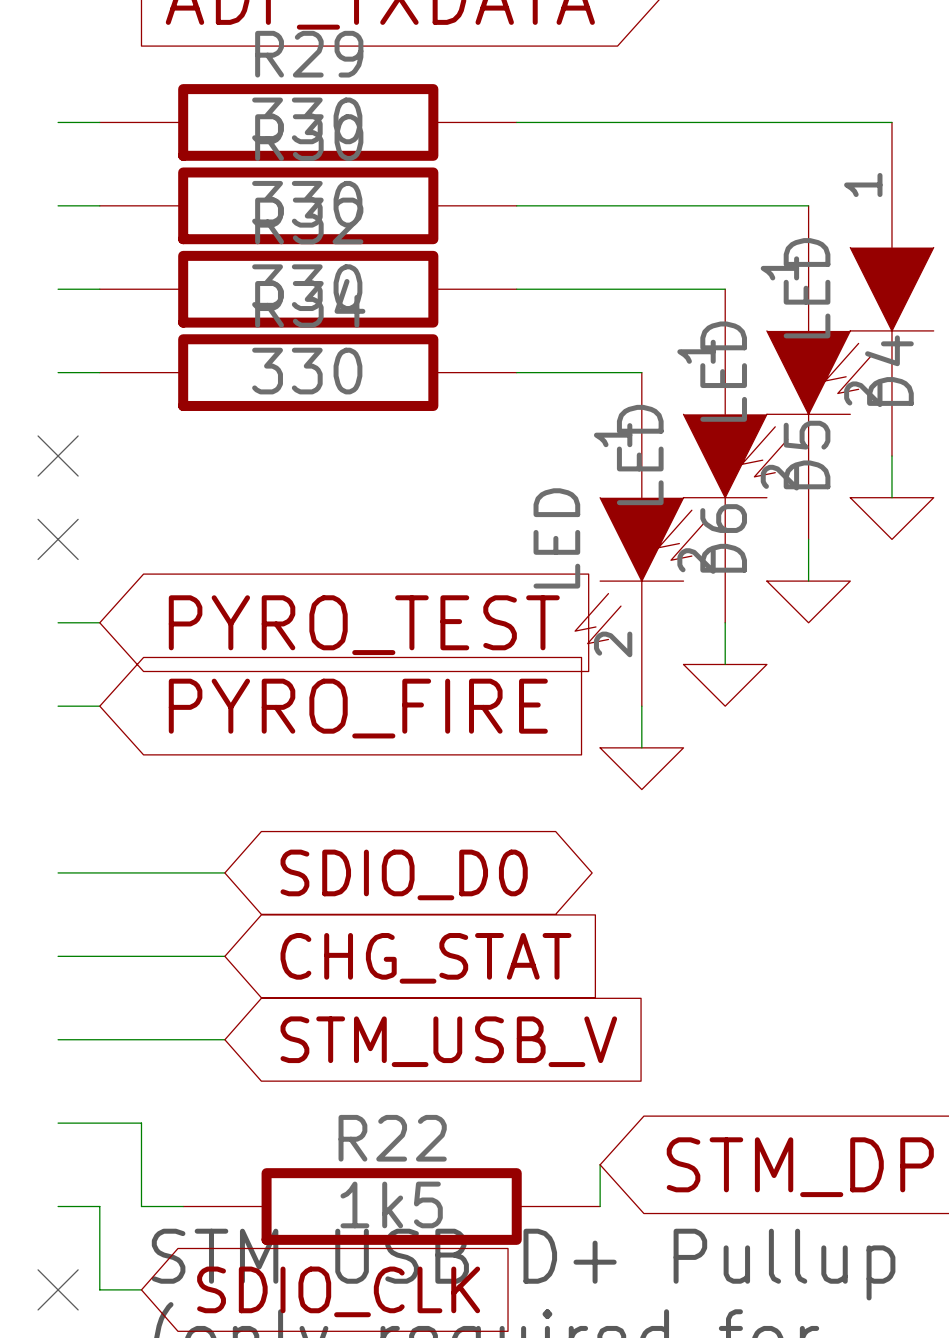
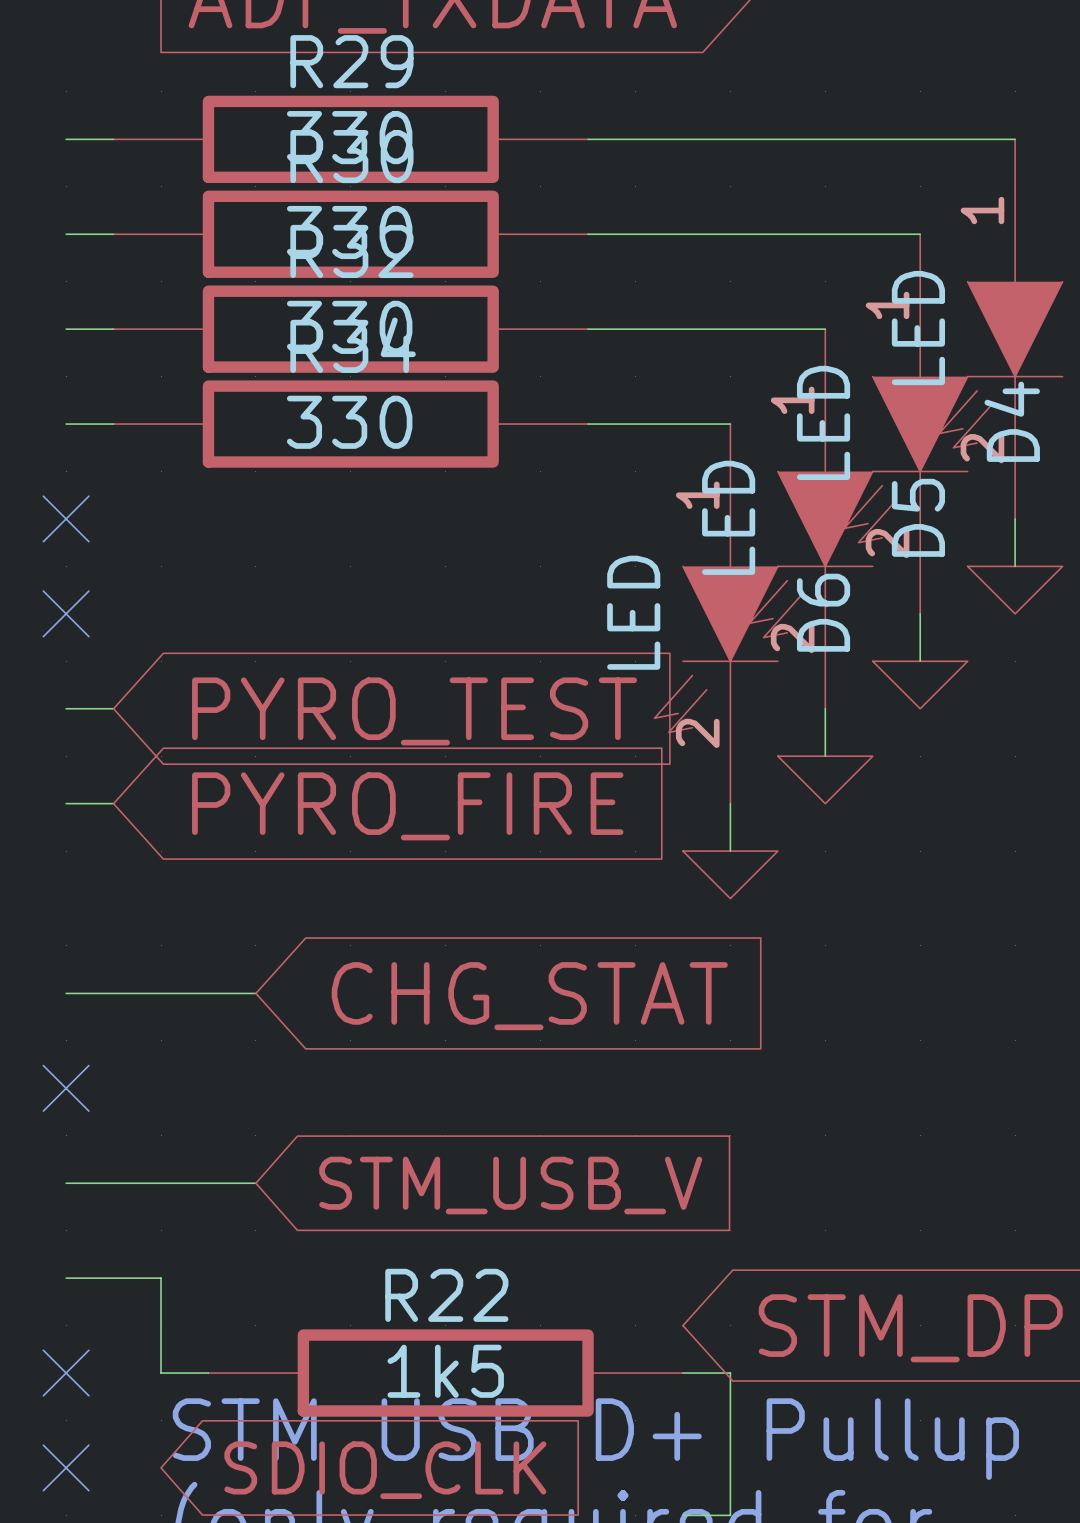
global label shape: bidirectional (404, 874) -> input (529, 996)
global label: SDIO_D0 (404, 874) -> CHG_STAT (529, 996)
wire: (58, 956) (224, 956) -> none
no-connect mark: none -> (66, 1088)
global label: CHG_STAT (425, 958) -> none
wire: (600, 1164) (600, 1206) -> (682, 1515) (730, 1515) (730, 1373) (682, 1373)
wire: (58, 1206) (99, 1206) (99, 1289) (141, 1289) -> none
no-connect mark: none -> (66, 1373)

